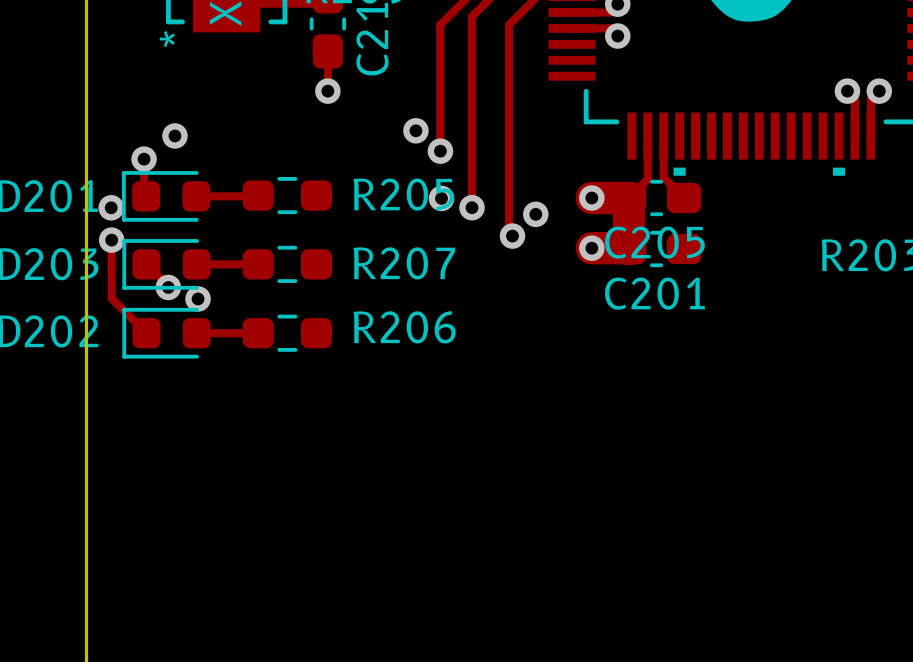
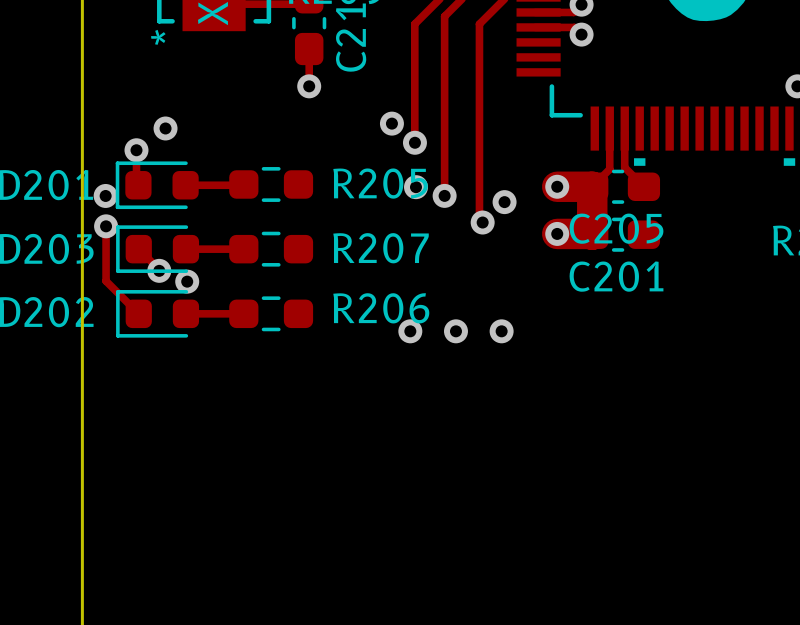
via: none -> (410, 331)
via: none -> (455, 331)
via: none -> (501, 331)

